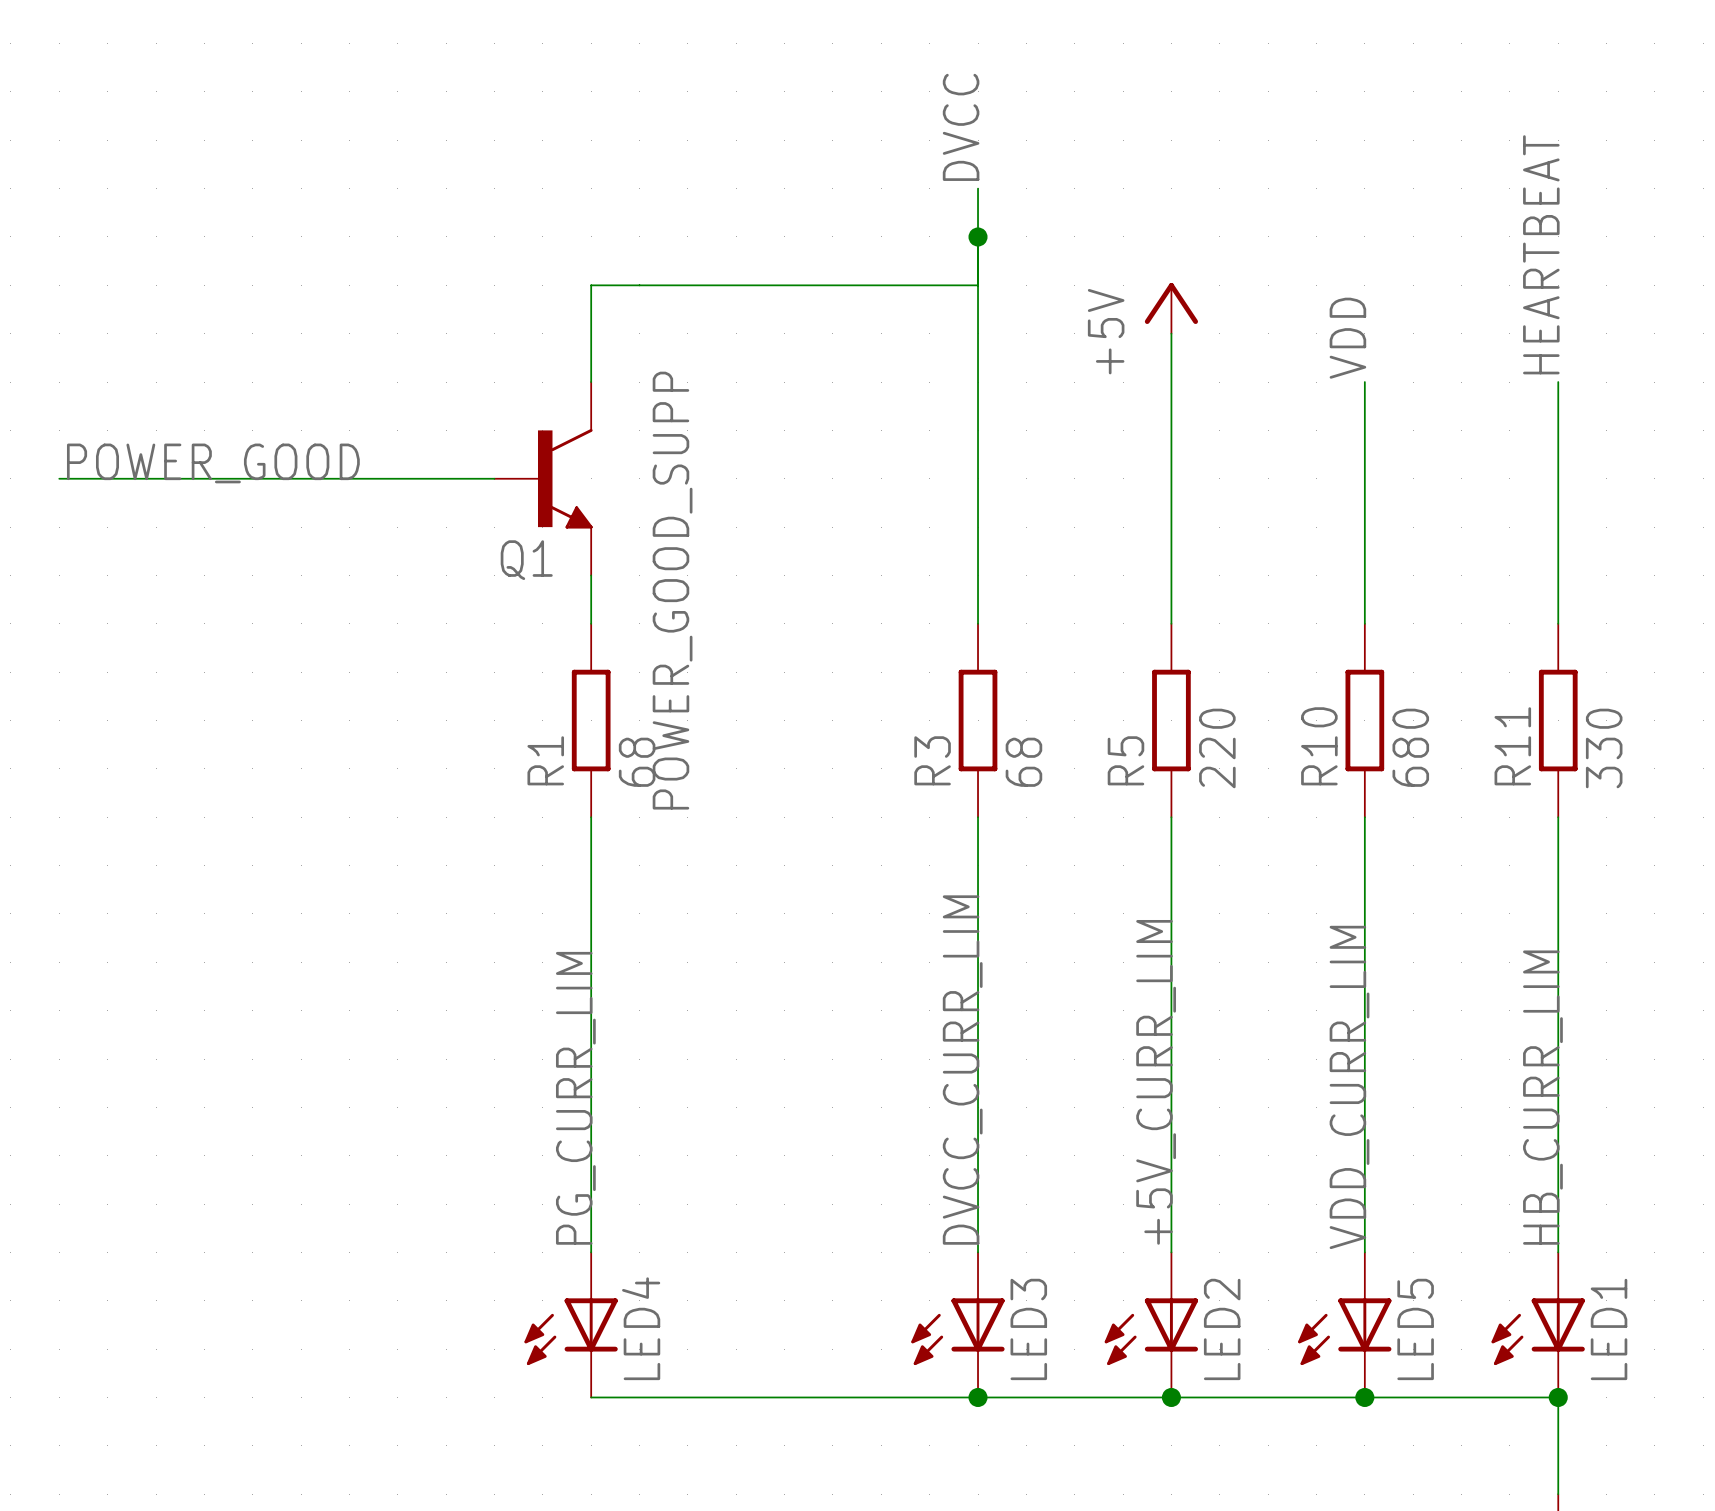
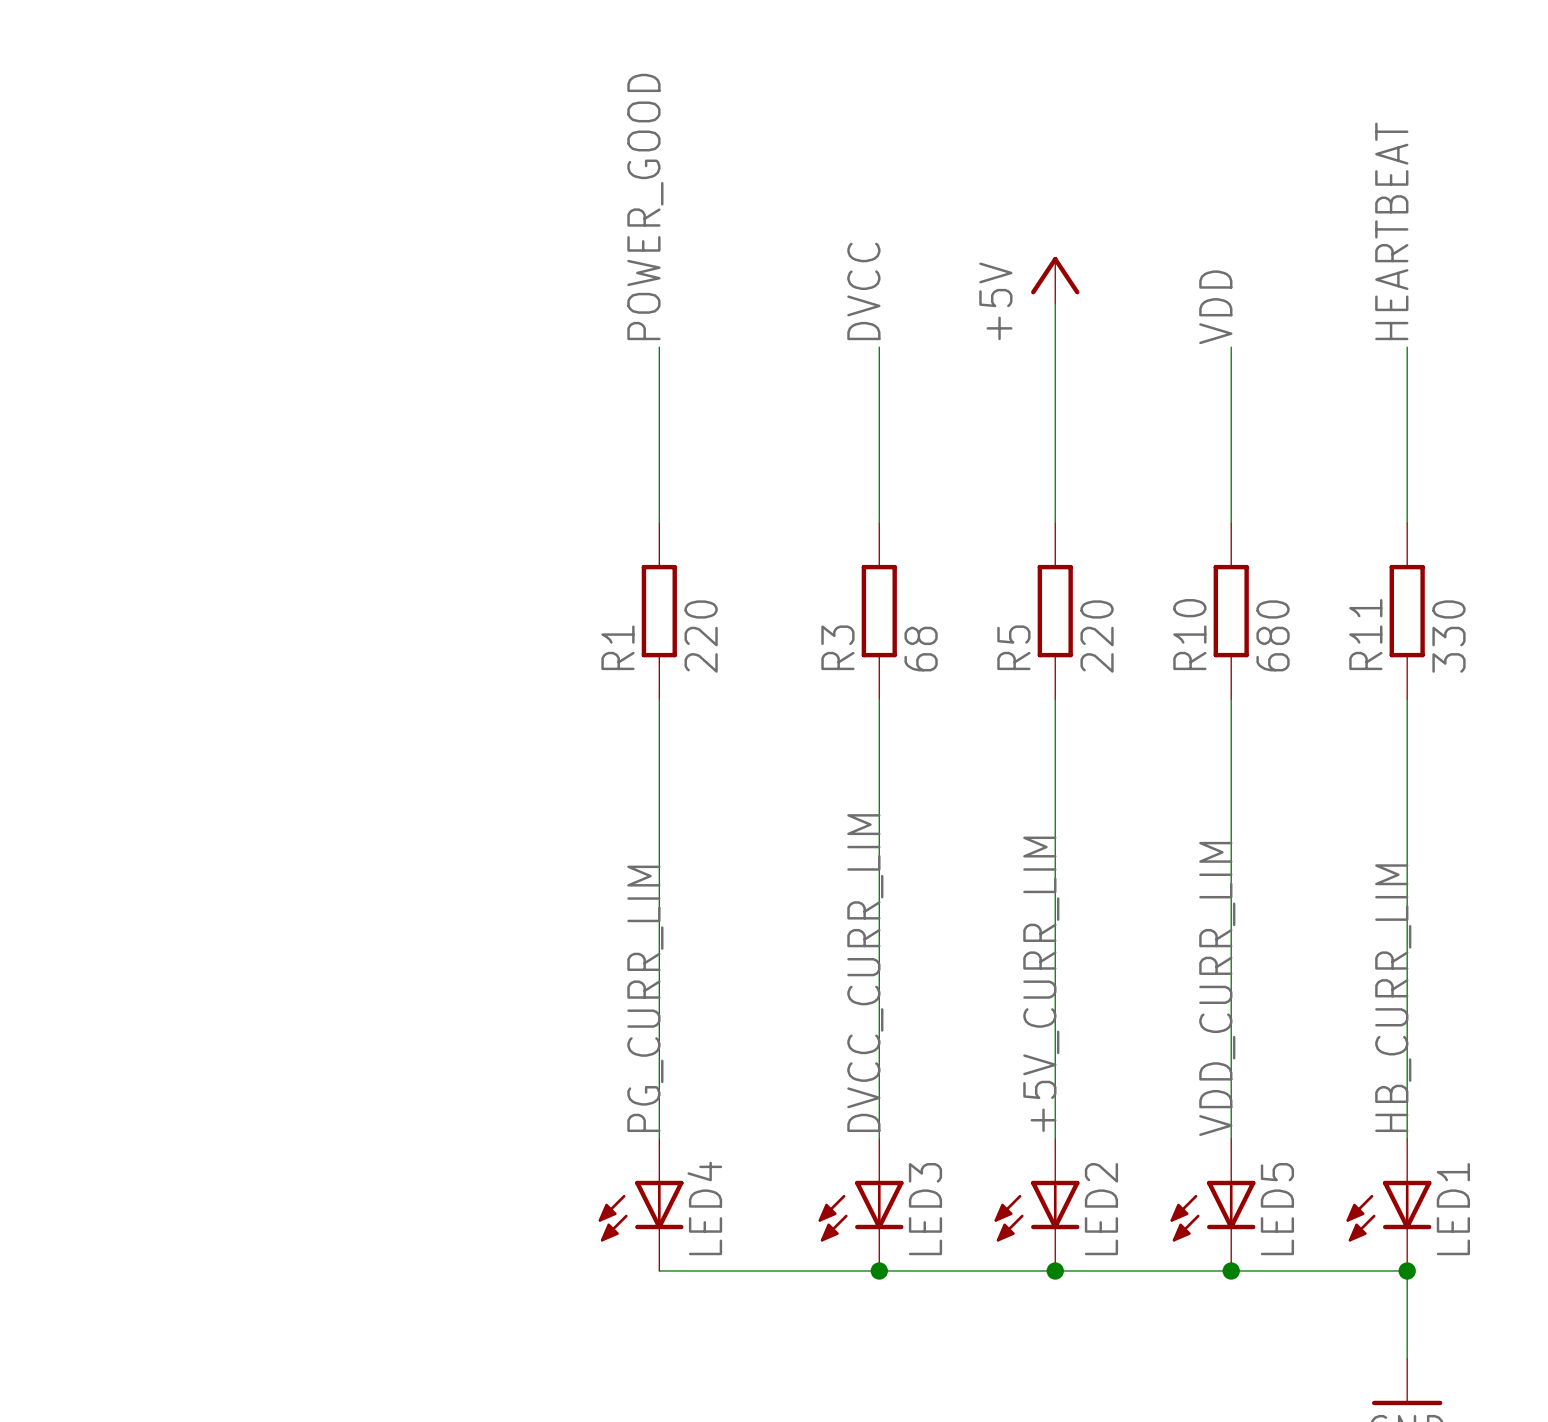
label position: DVCC (961, 127) -> DVCC (863, 291)
wire: (978, 188) (978, 382) -> (659, 347) (659, 523)
junction: (978, 236) -> none
wire: (978, 285) (591, 285) (591, 382) -> none
label: POWER_GOOD (213, 463) -> none
wire: (59, 478) (494, 478) -> none
Q1: (543, 478) -> none
wire: (591, 575) (591, 623) -> none
label: POWER_GOOD_SUPP (672, 590) -> POWER_GOOD (645, 206)
R1 position: (591, 720) -> (659, 611)
R3 position: (978, 720) -> (879, 611)
R5 position: (1171, 720) -> (1055, 611)
R10 position: (1364, 720) -> (1231, 611)
R11 position: (1558, 720) -> (1407, 611)
R1 value: 68 (637, 762) -> 220 (701, 636)
wire: none -> (659, 699) (659, 1139)
wire: (591, 817) (591, 1252) -> none
label position: PG_CURR_LIM (575, 1098) -> PG_CURR_LIM (645, 998)
LED4 position: (571, 1324) -> (641, 1205)
wire: (591, 1397) (736, 1397) -> none

